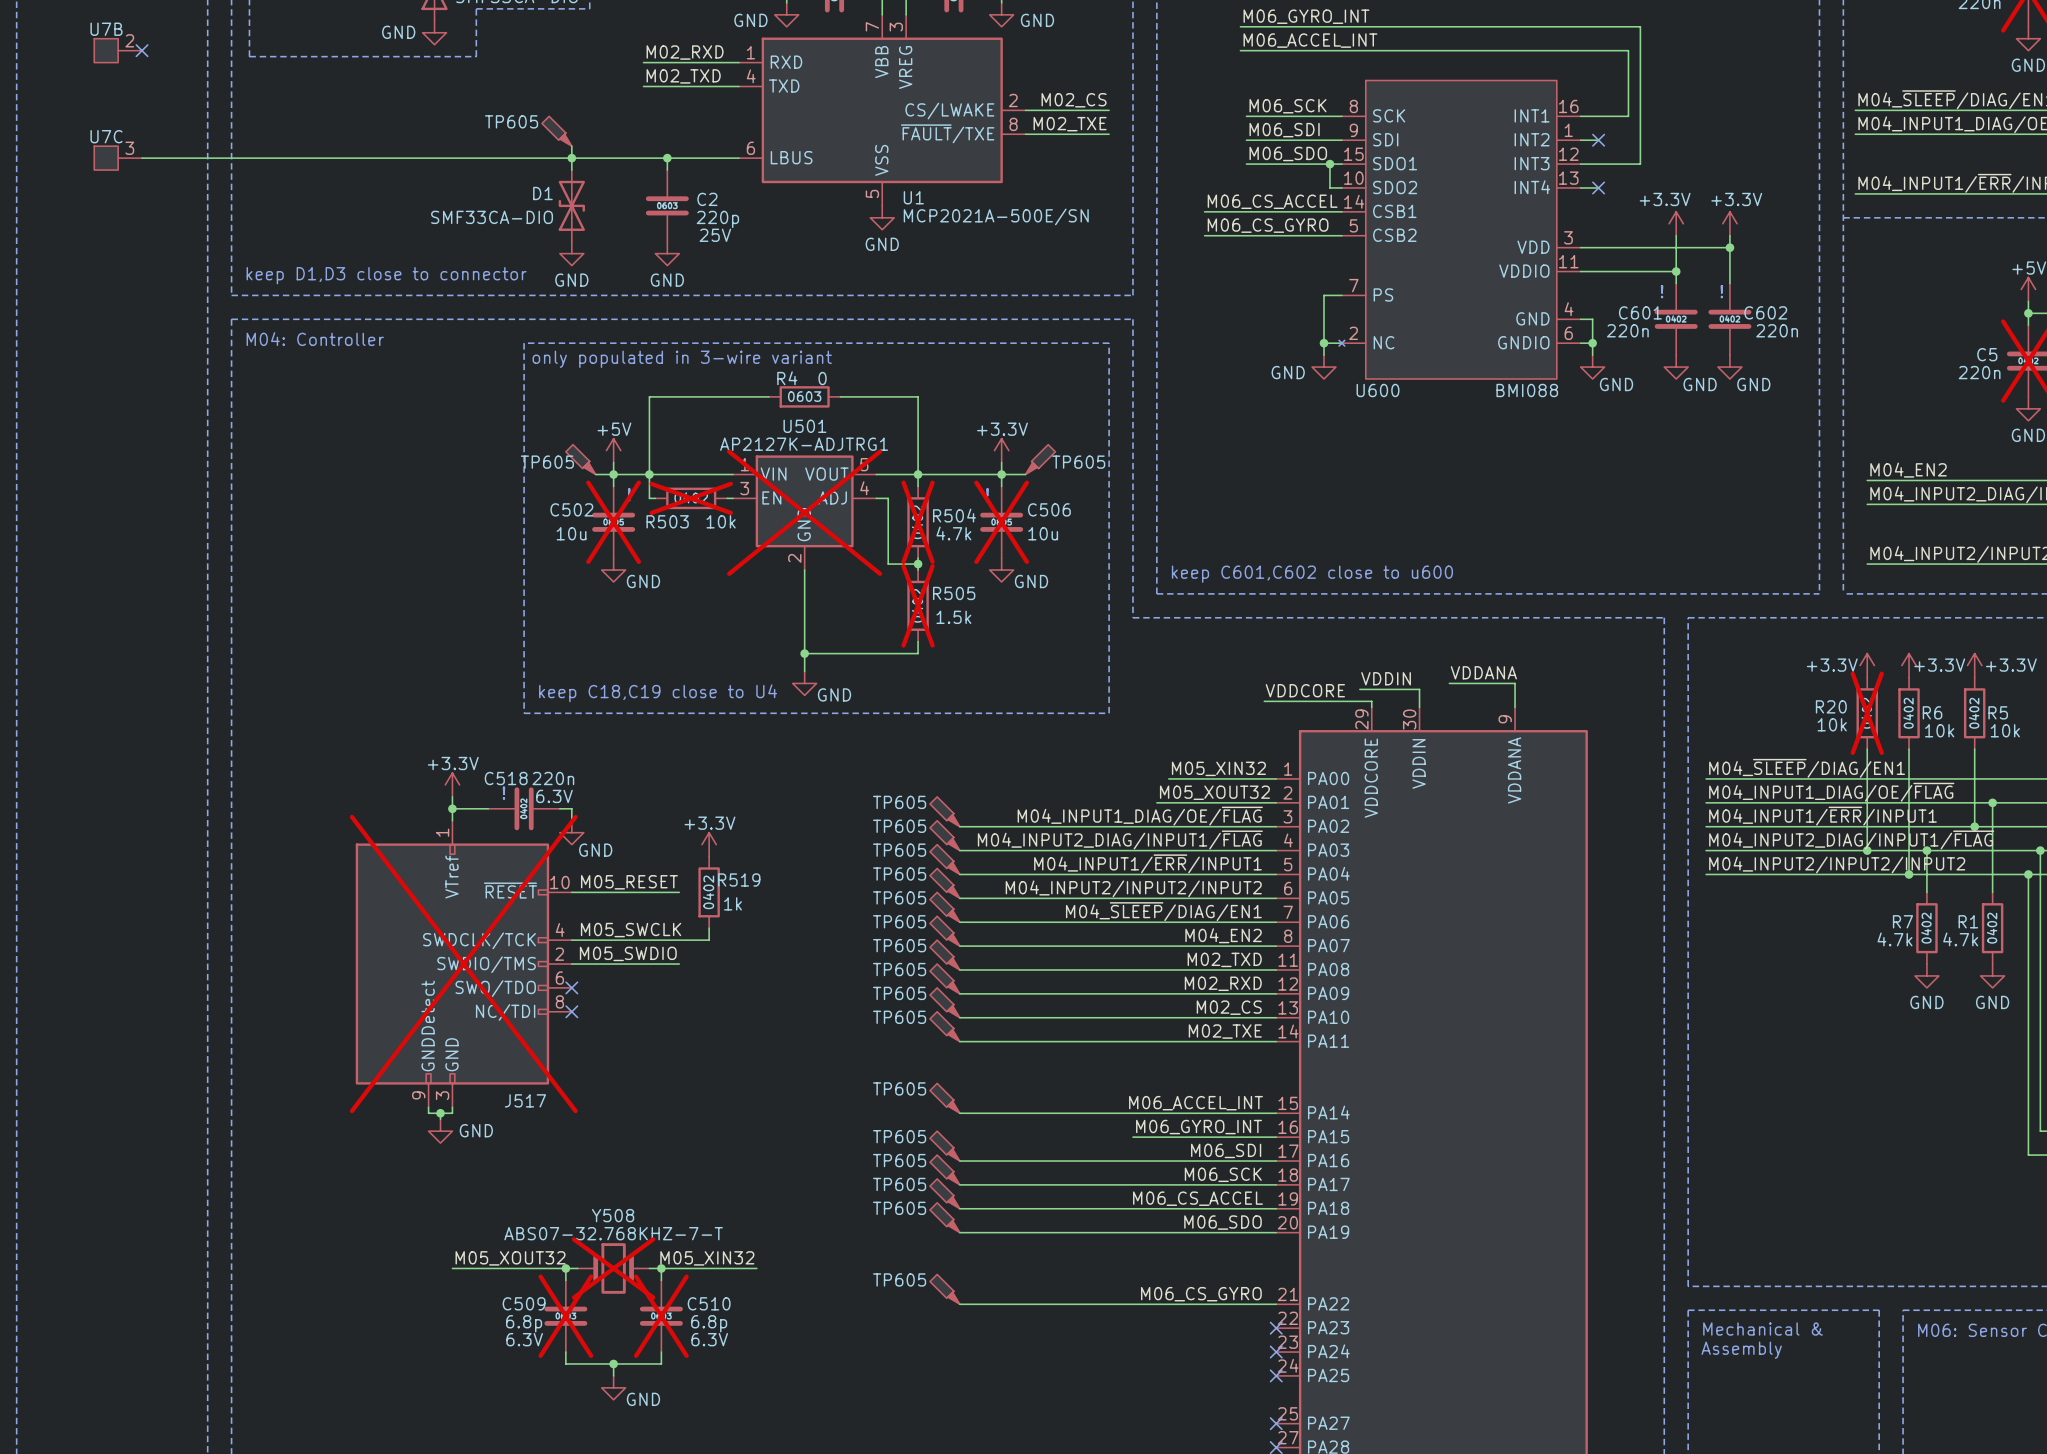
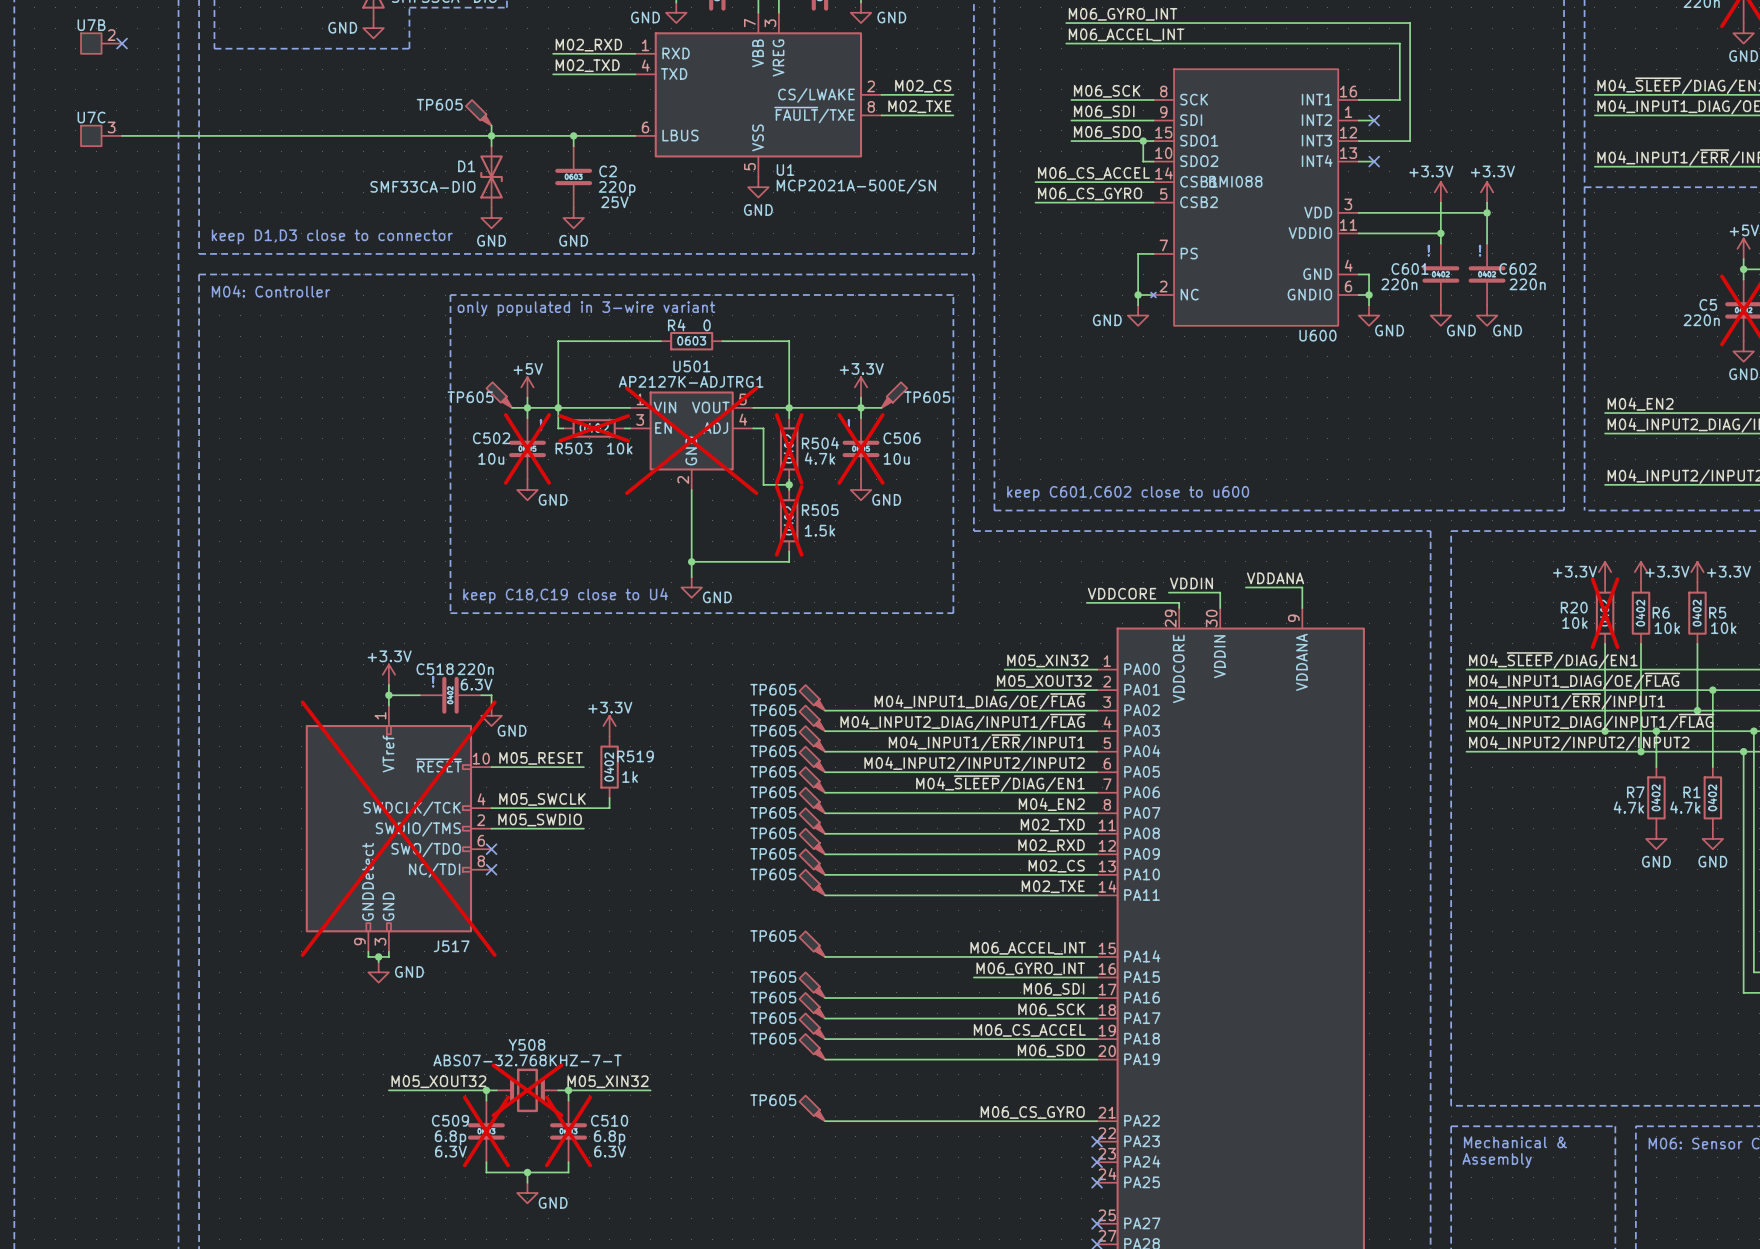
U600 name position: U600 (1378, 390) -> U600 (1317, 335)
U600 value position: BMI088 (1527, 390) -> BMI088 (1235, 181)

